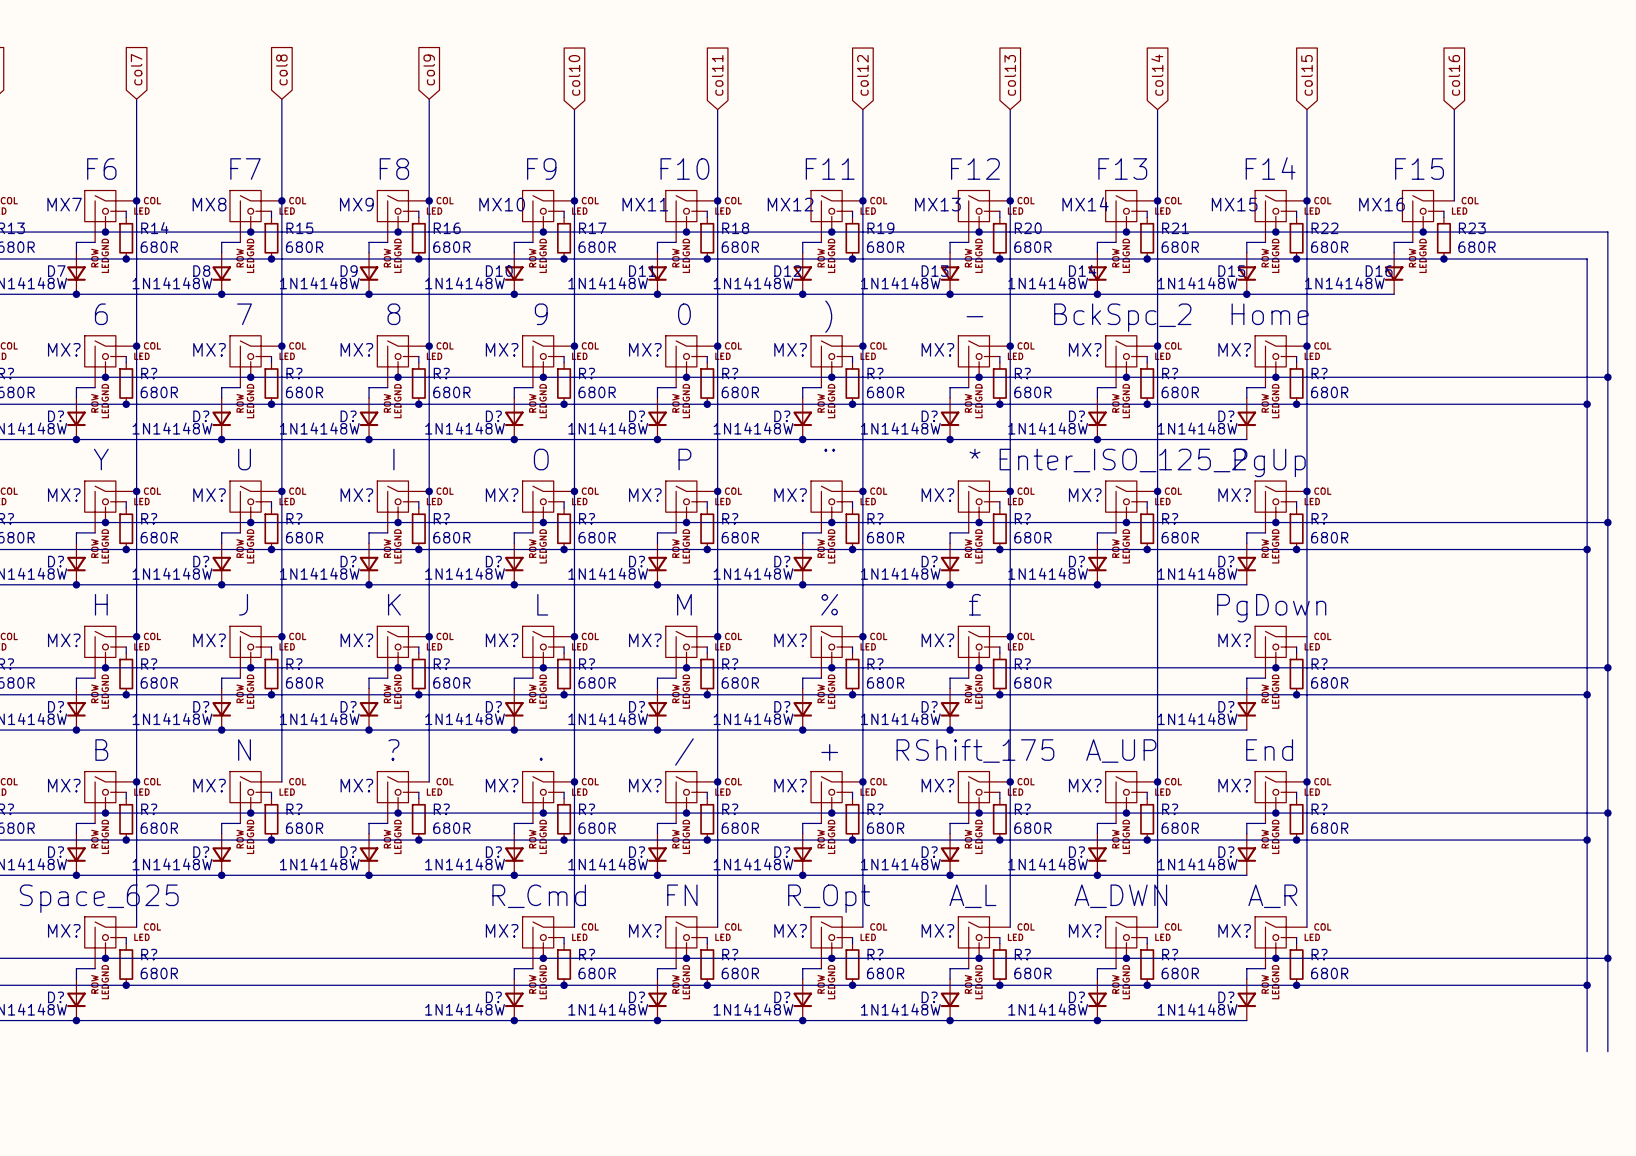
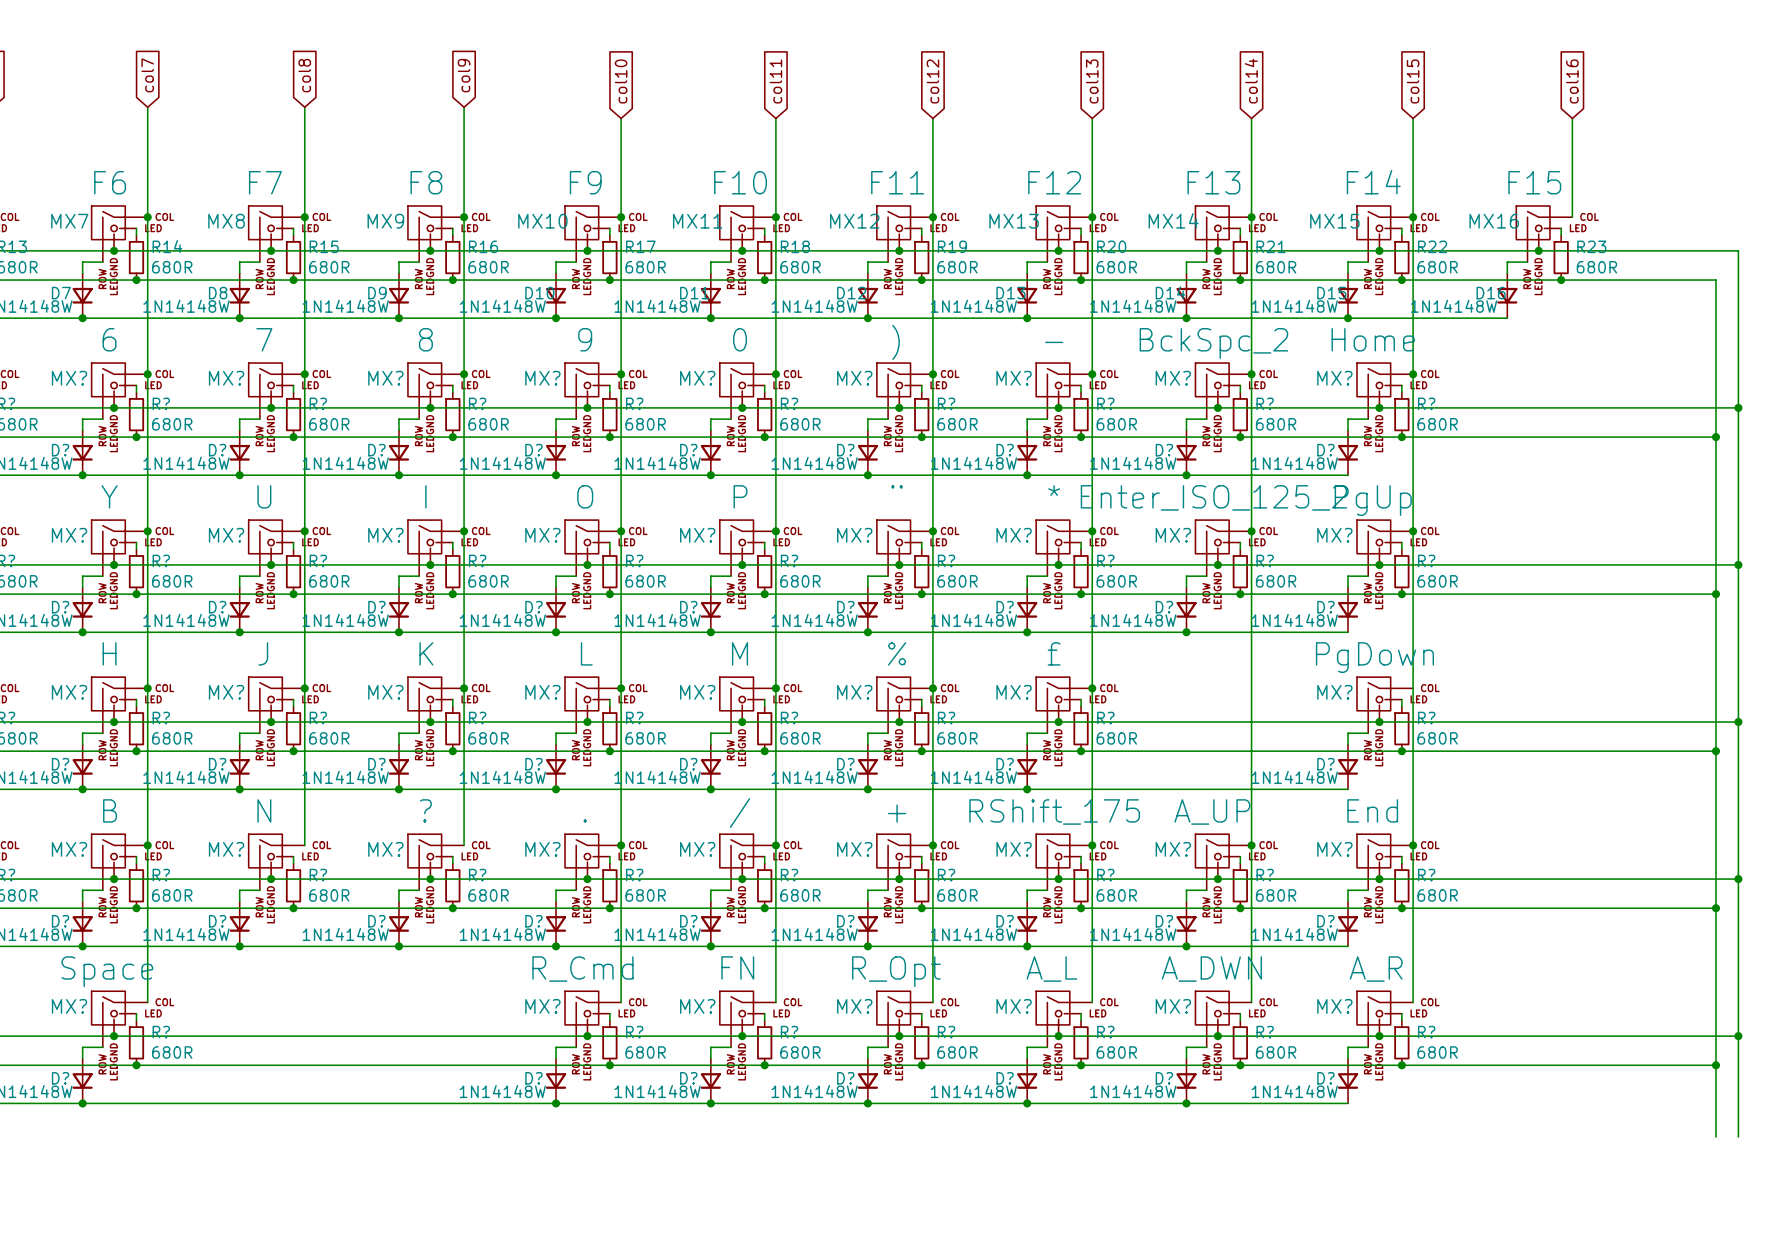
MX? value: Space_625 (99, 898) -> Space (107, 971)

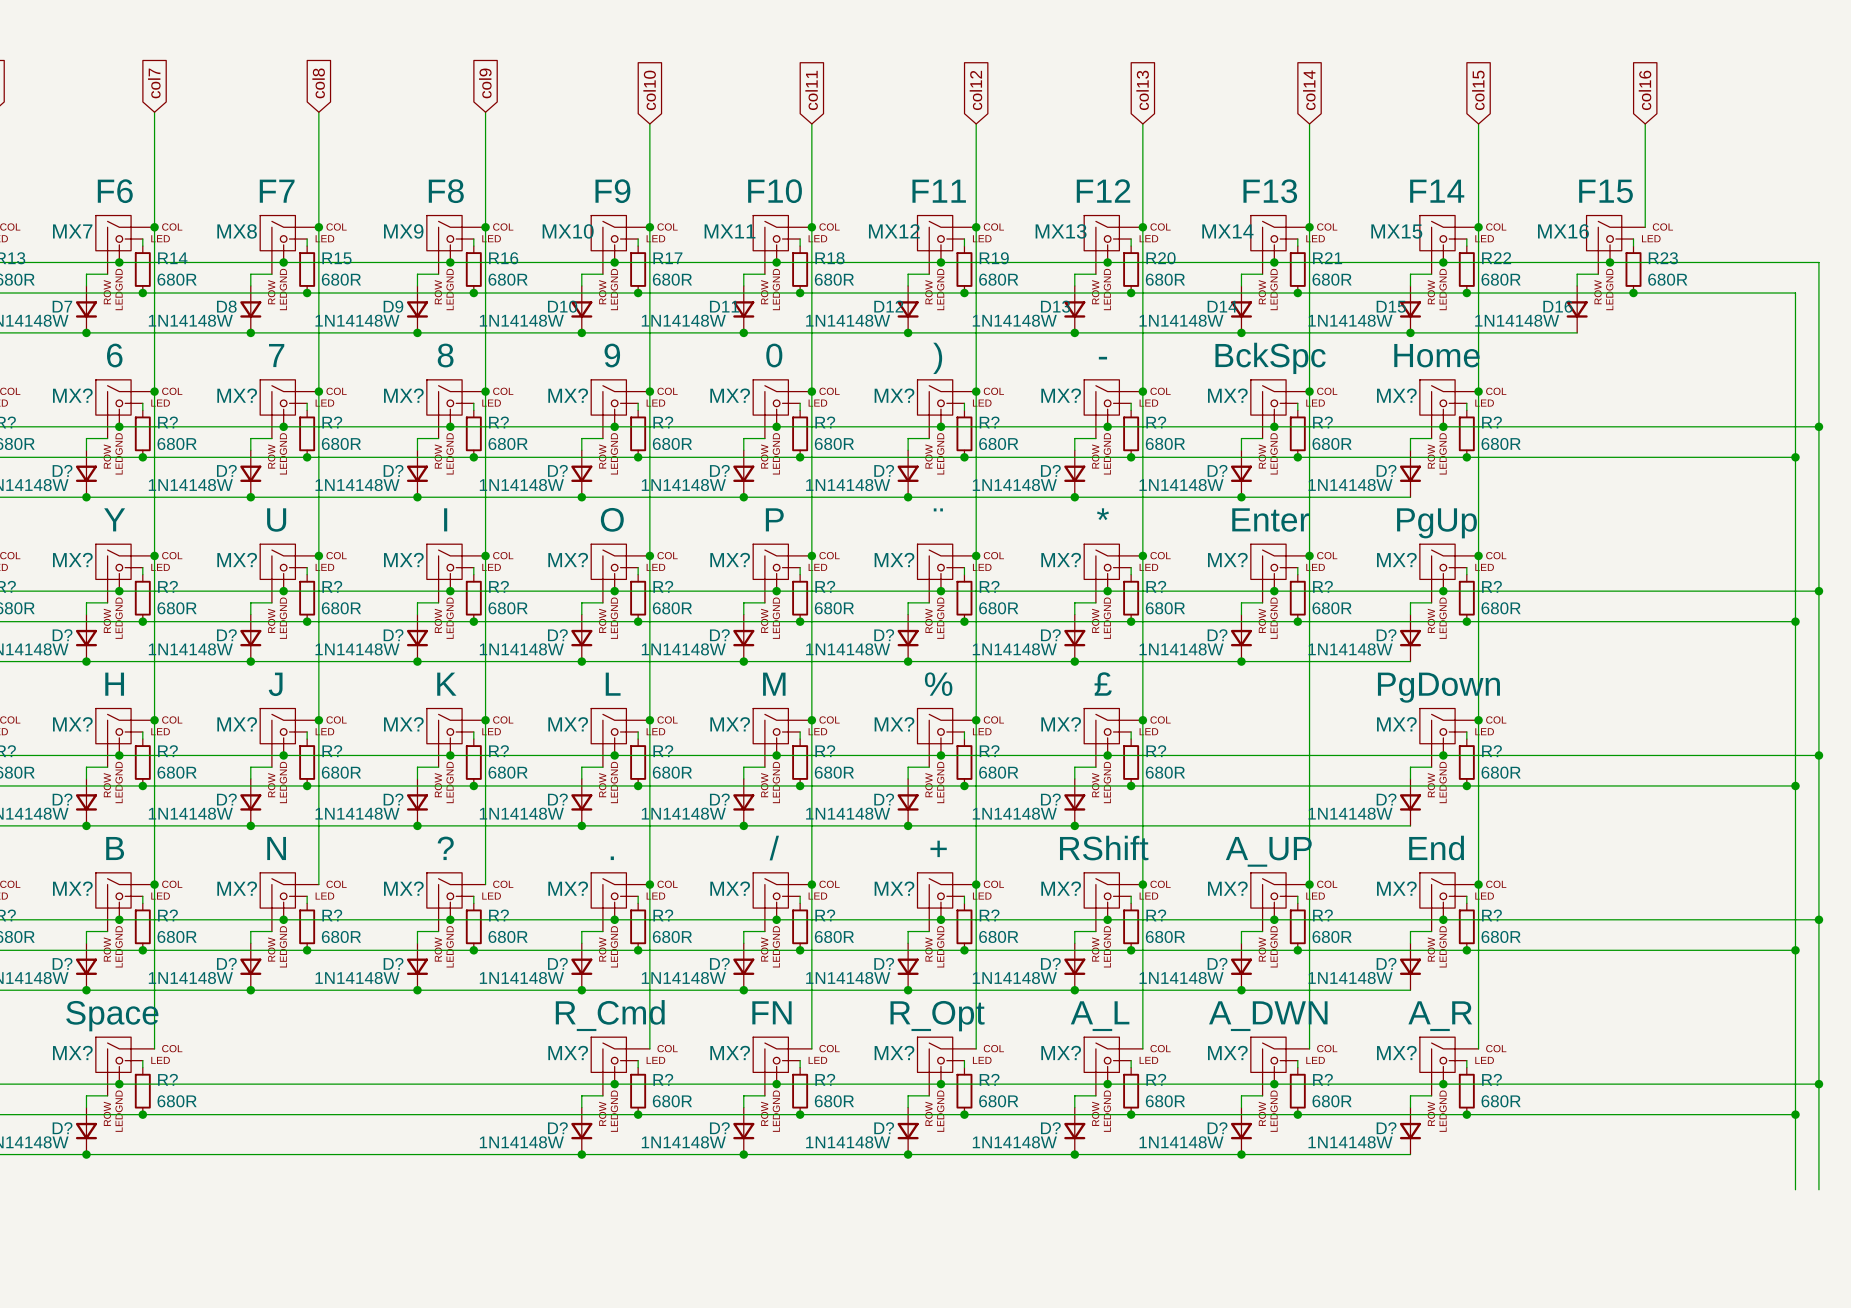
MX? value: BckSpc_2 (1213, 343) -> BckSpc (1270, 358)
MX? value: Enter_ISO_125_2 (1213, 497) -> Enter (1270, 520)
junction: none -> (1478, 720)
MX? value: RShift_175 (1054, 811) -> RShift (1104, 848)

